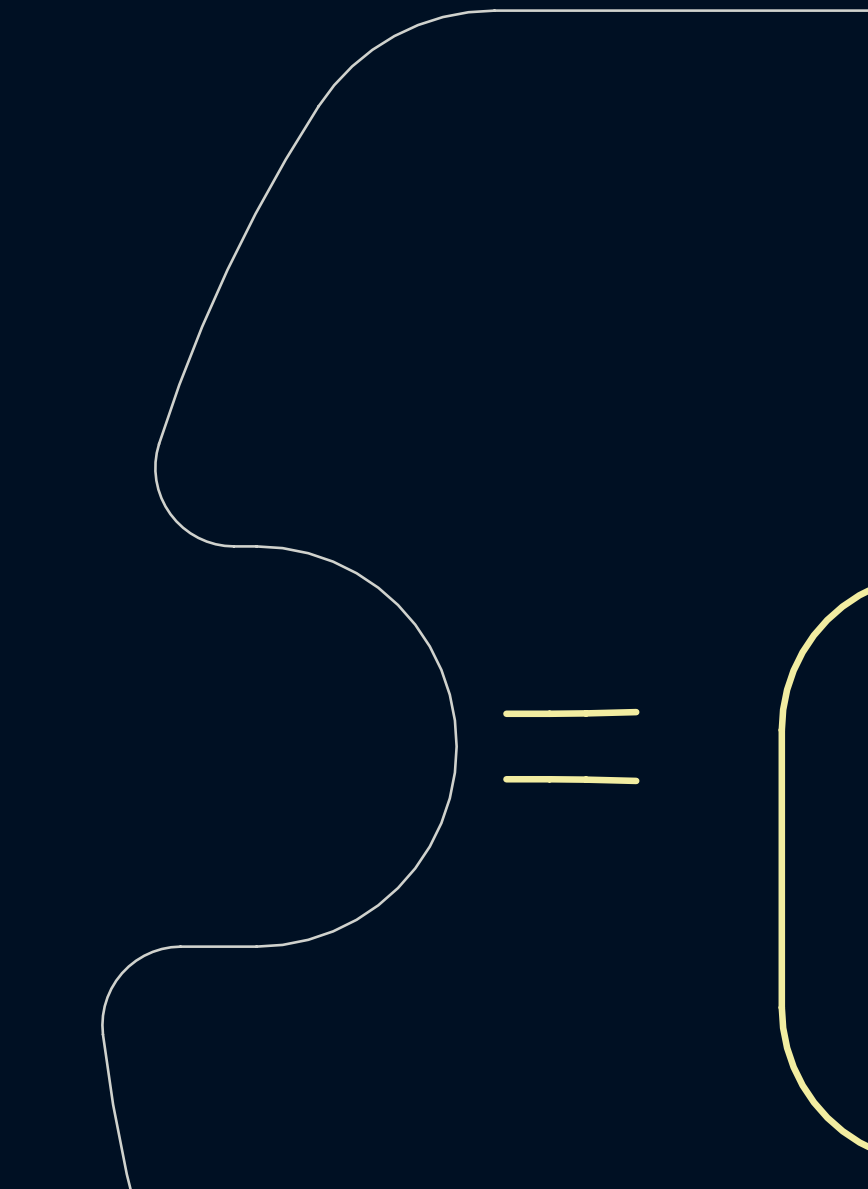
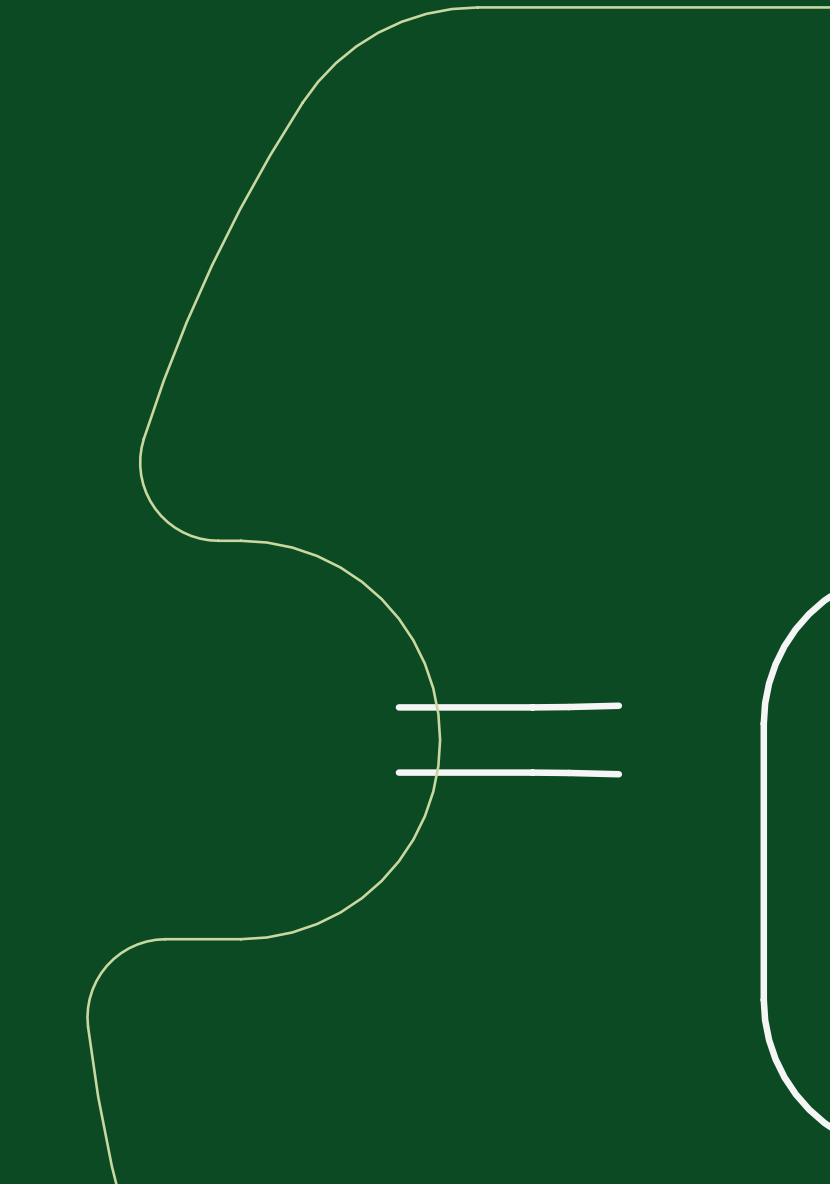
line: none -> (398, 707) (489, 707)
line: none -> (398, 772) (489, 772)

